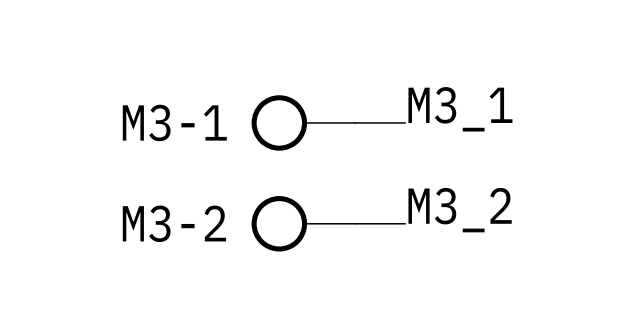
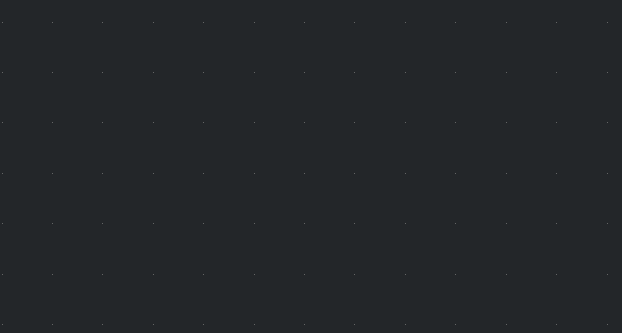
label: M3_1 (460, 109) -> none
M3-1: (303, 122) -> none
wire: (354, 122) (405, 122) -> none
label: M3_2 (460, 210) -> none
M3-2: (303, 223) -> none
wire: (354, 223) (405, 223) -> none

